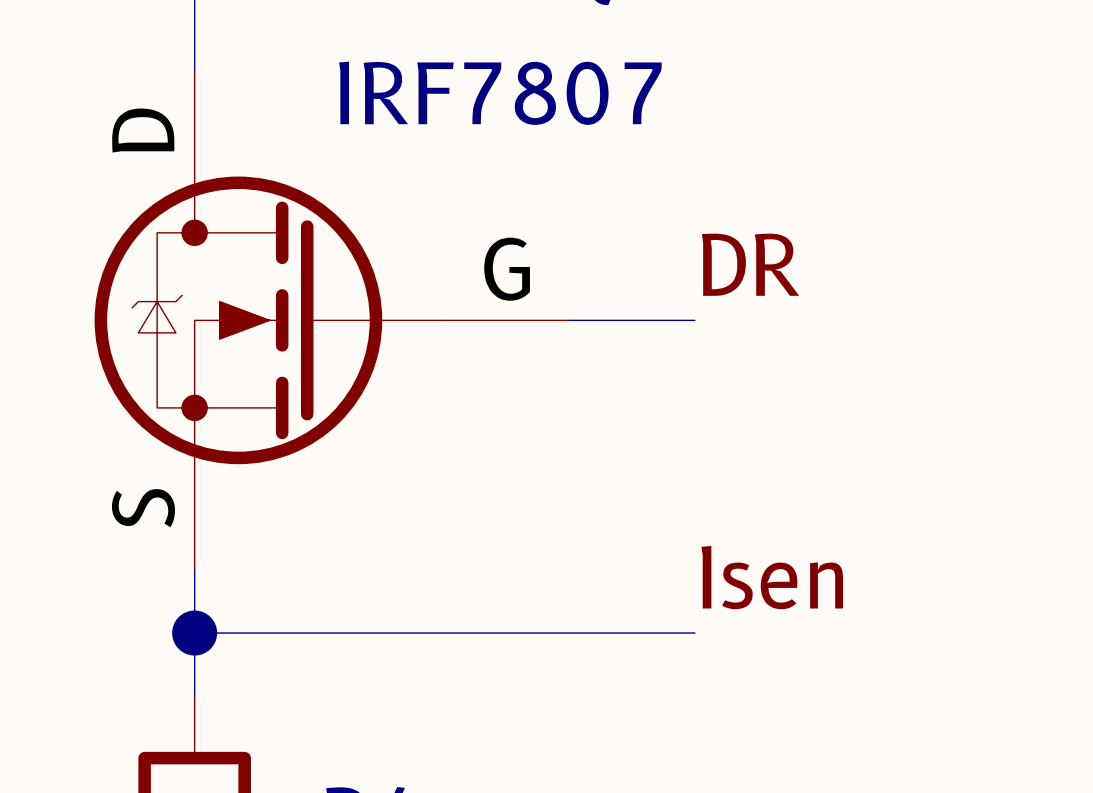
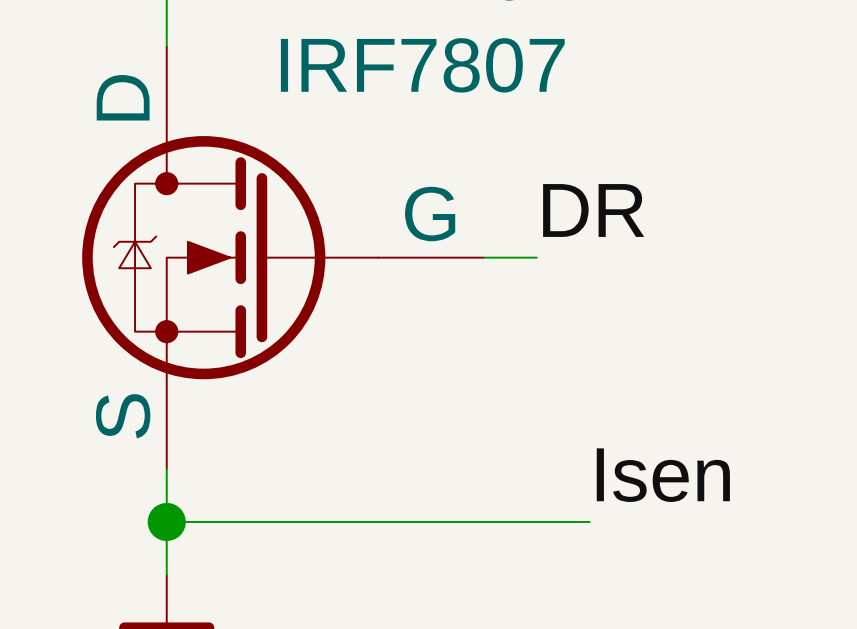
label position: DR (750, 264) -> DR (593, 210)
wire: (632, 320) (694, 320) -> none

